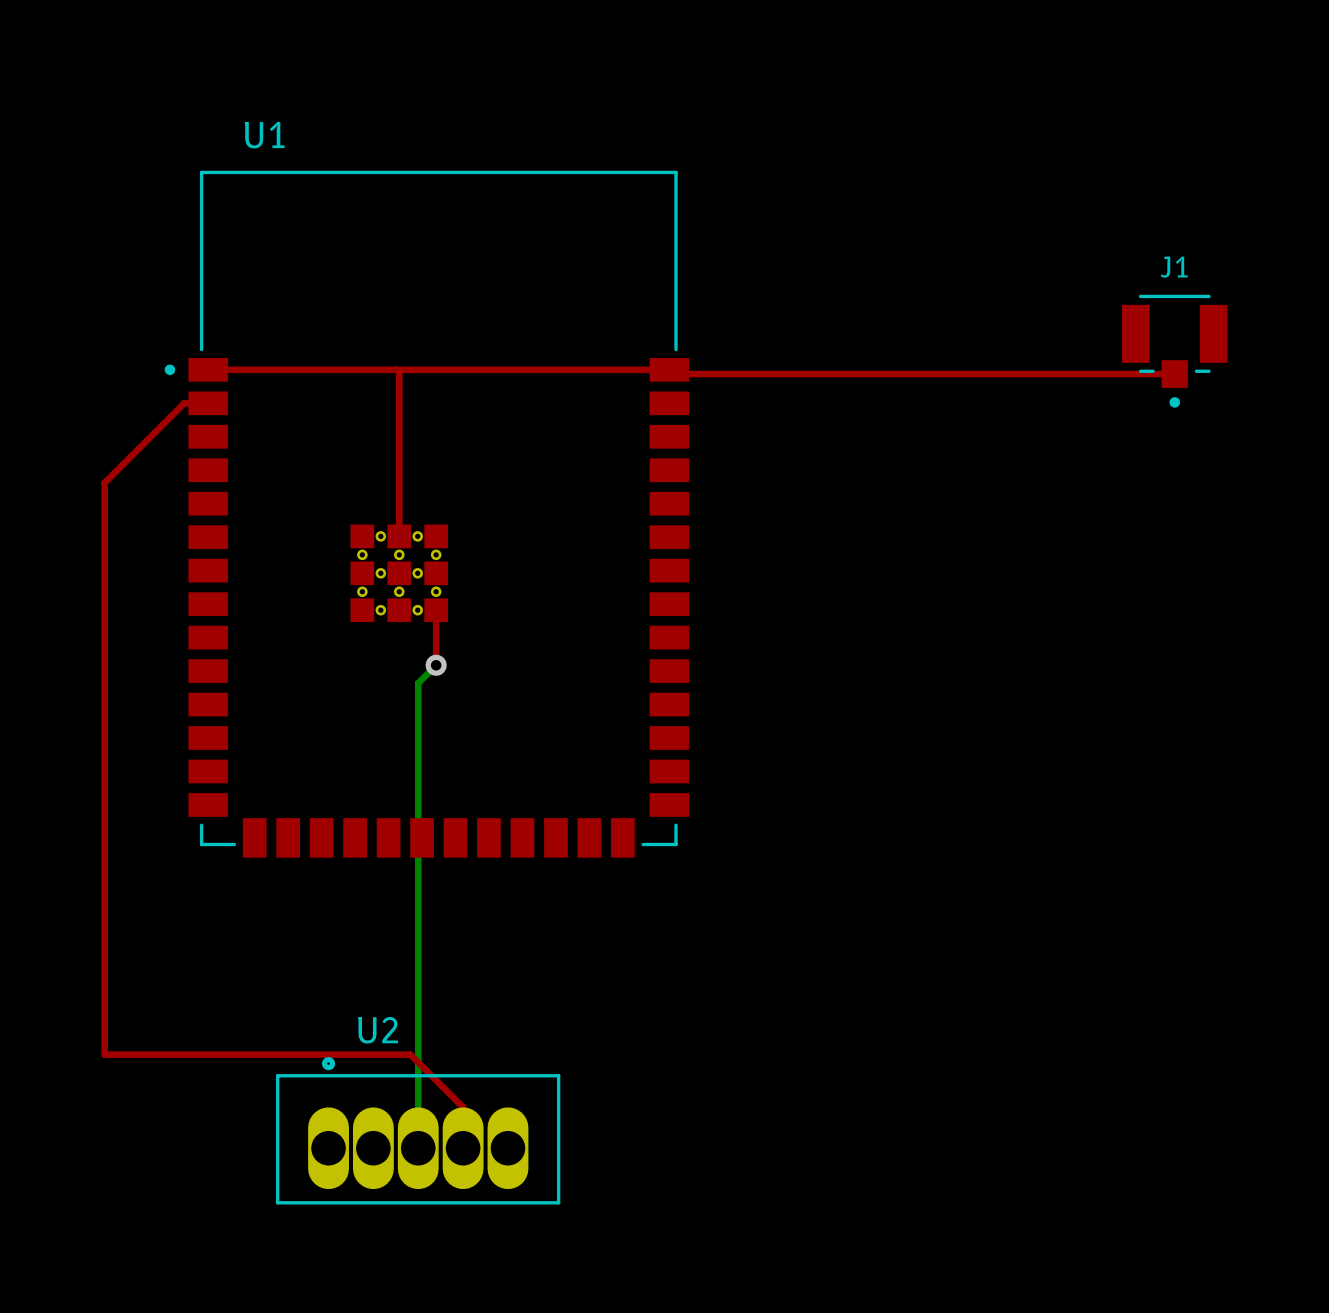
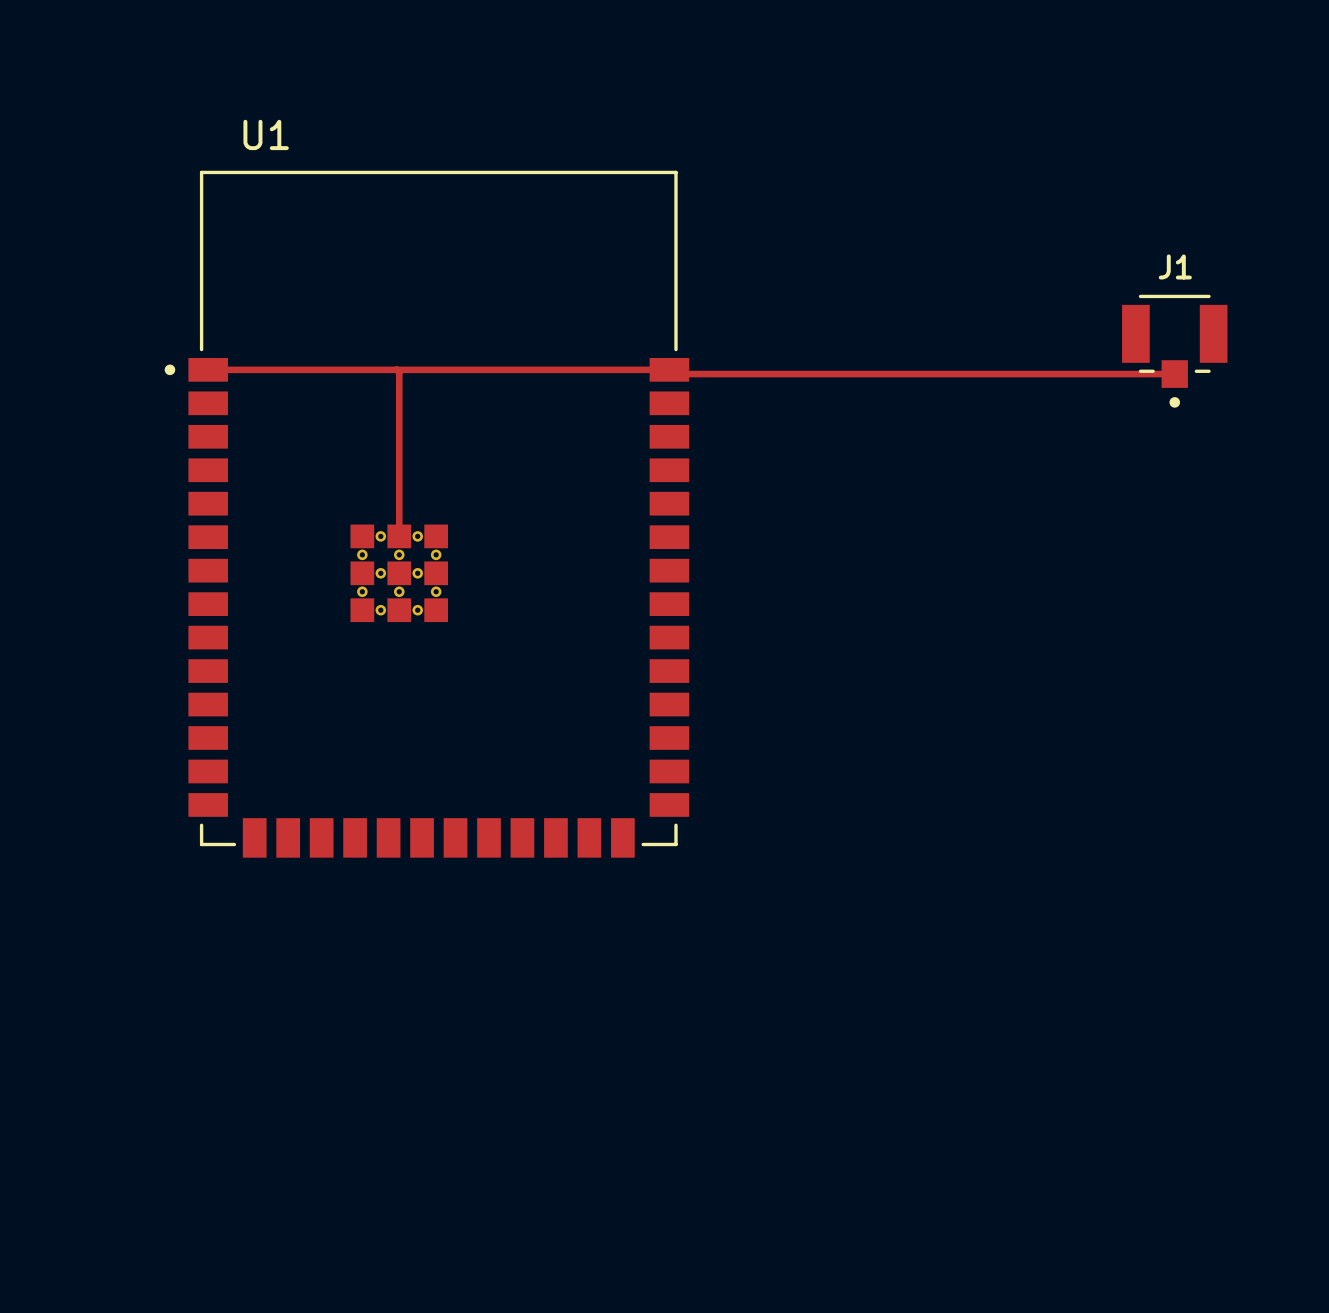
top track: (208, 403) (184, 403) (104, 482) (104, 1054) (410, 1054) (463, 1107) (463, 1148) -> none
top track: (436, 610) (436, 665) -> none
bottom track: (436, 665) (418, 683) (418, 1148) -> none
via: (436, 665) -> none
U2: (418, 1130) -> none

